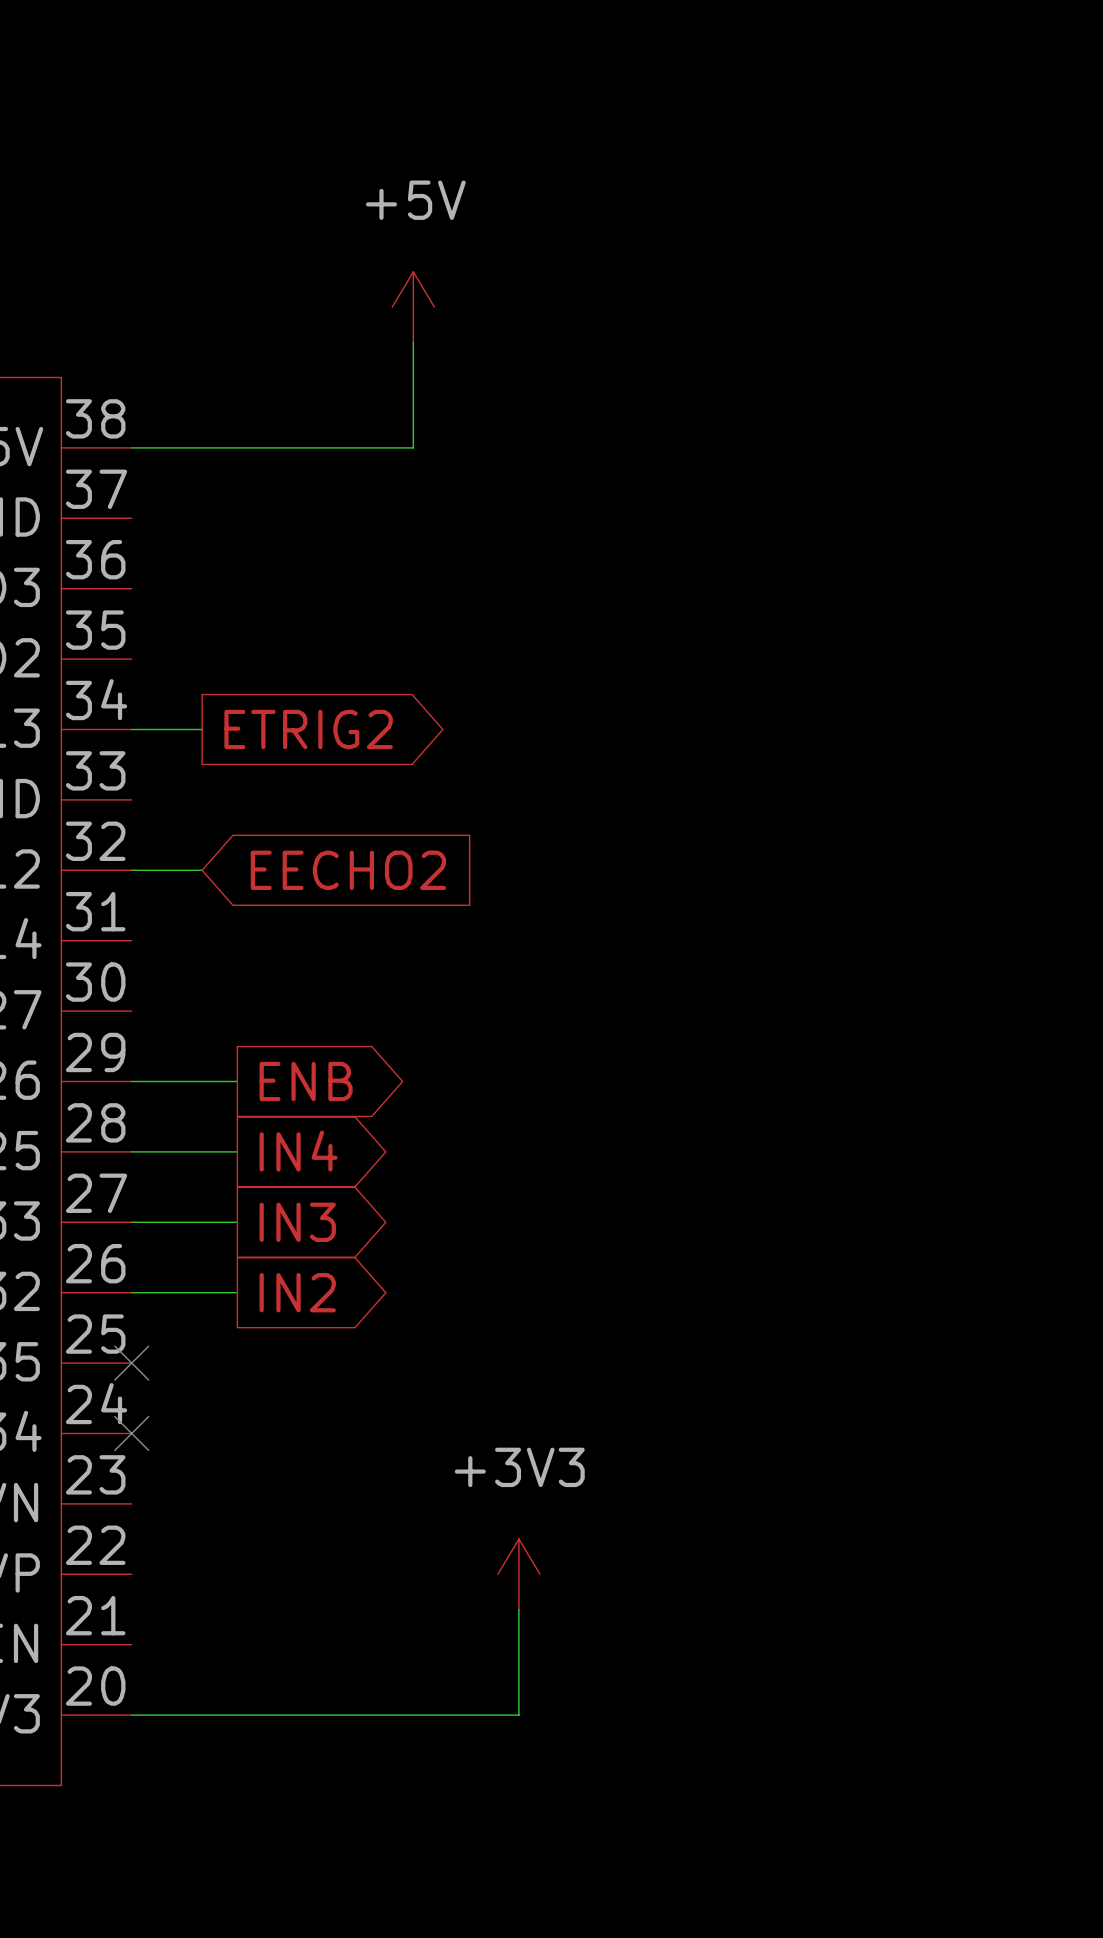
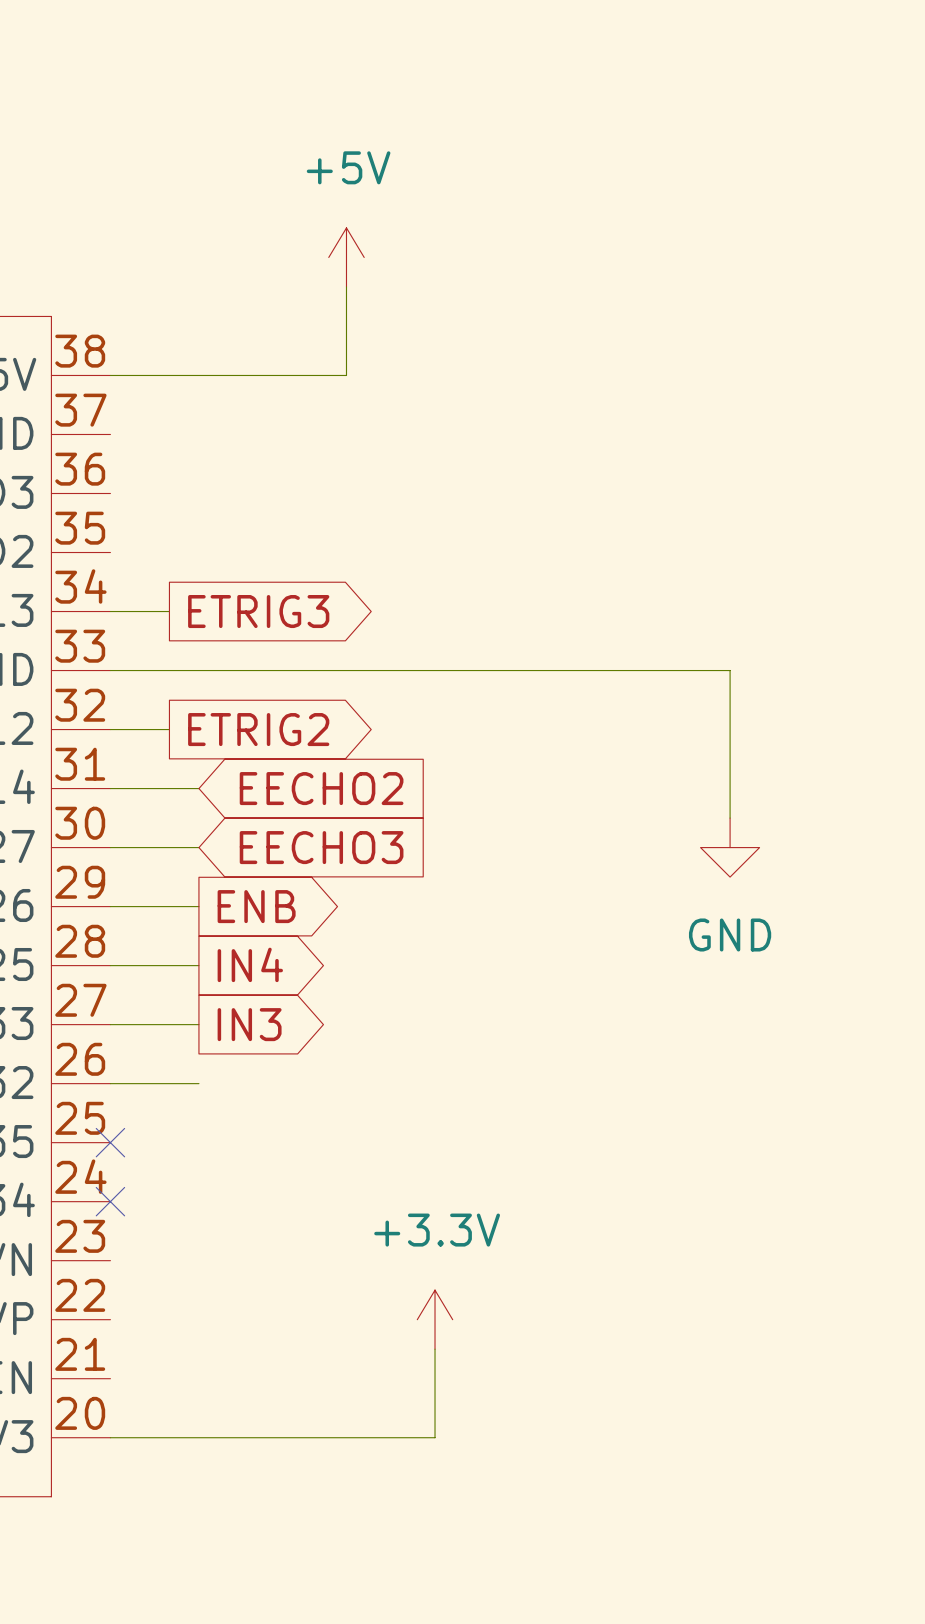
global label: ETRIG2 (308, 729) -> ETRIG3 (258, 611)
wire: none -> (110, 670) (730, 670) (730, 818)
global label shape: input (348, 870) -> output (258, 729)
global label: EECHO2 (348, 870) -> ETRIG2 (258, 729)
wire: none -> (110, 788) (198, 788)
global label: none -> EECHO2 (321, 788)
wire: none -> (110, 847) (198, 847)
global label: none -> EECHO3 (321, 847)
power symbol: none -> GND (730, 847)
global label: IN2 (297, 1292) -> none
power symbol: +3V3 (518, 1574) -> +3.3V (435, 1319)

